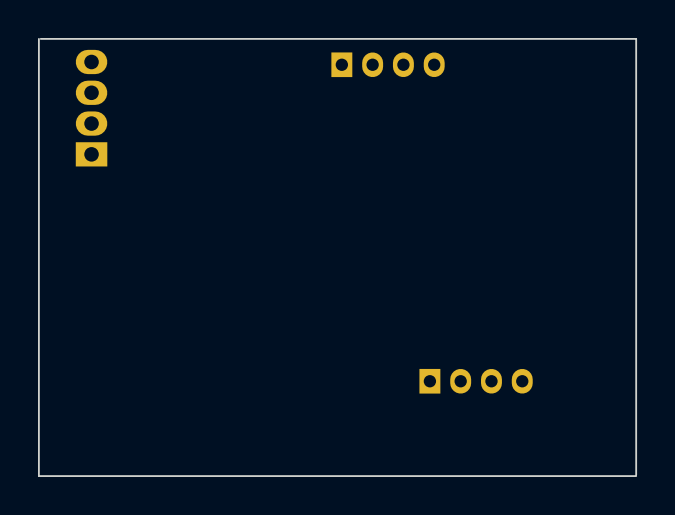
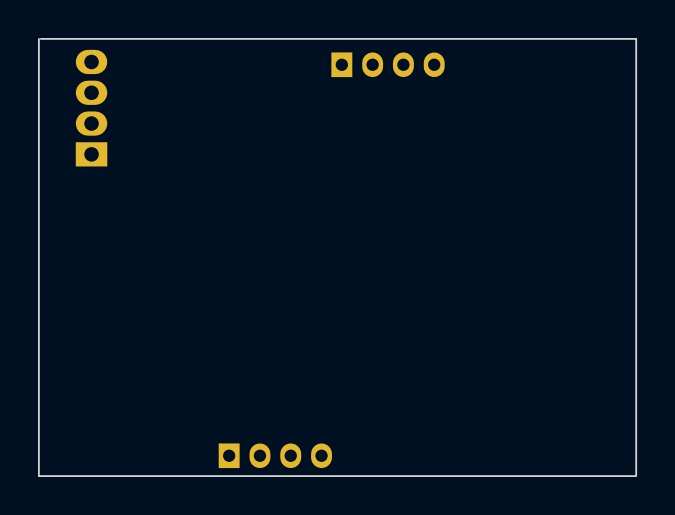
part position: (476, 381) -> (275, 455)

